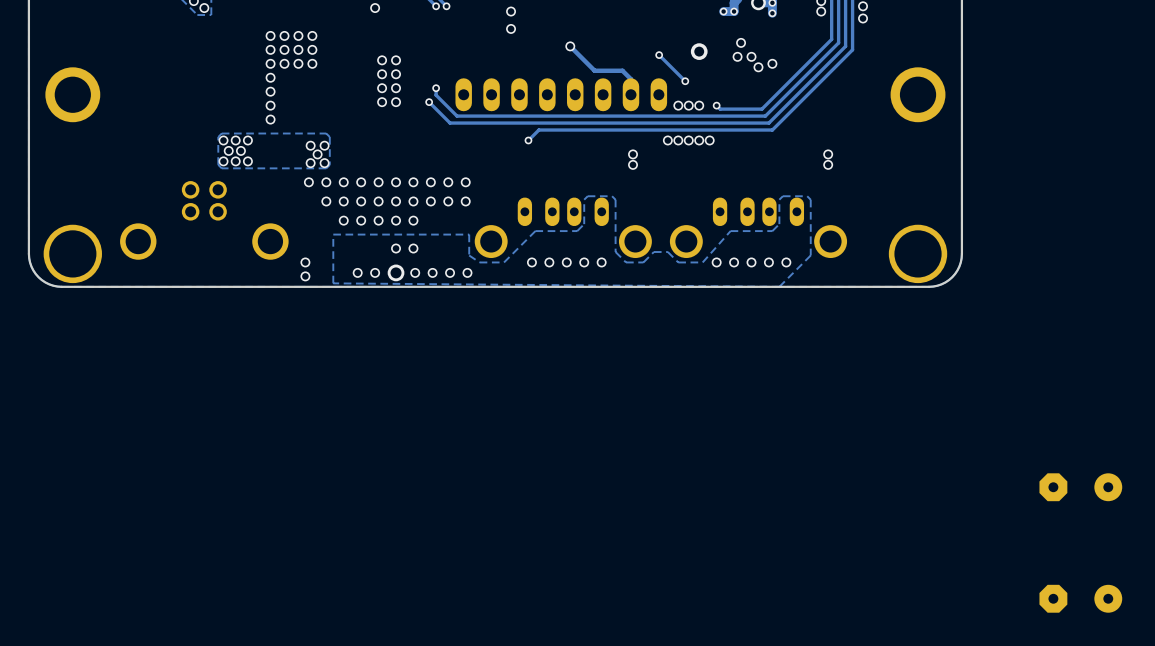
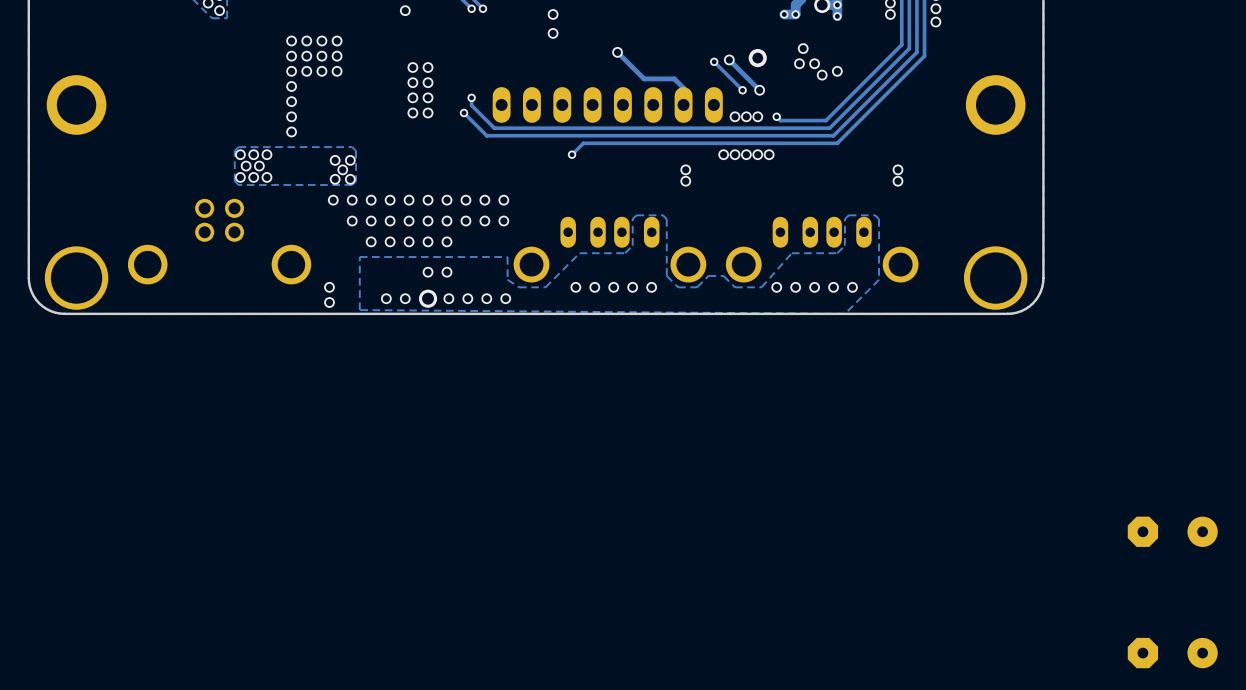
track: none -> (729, 59) (759, 90)
via: none -> (729, 59)
via: none -> (759, 90)

